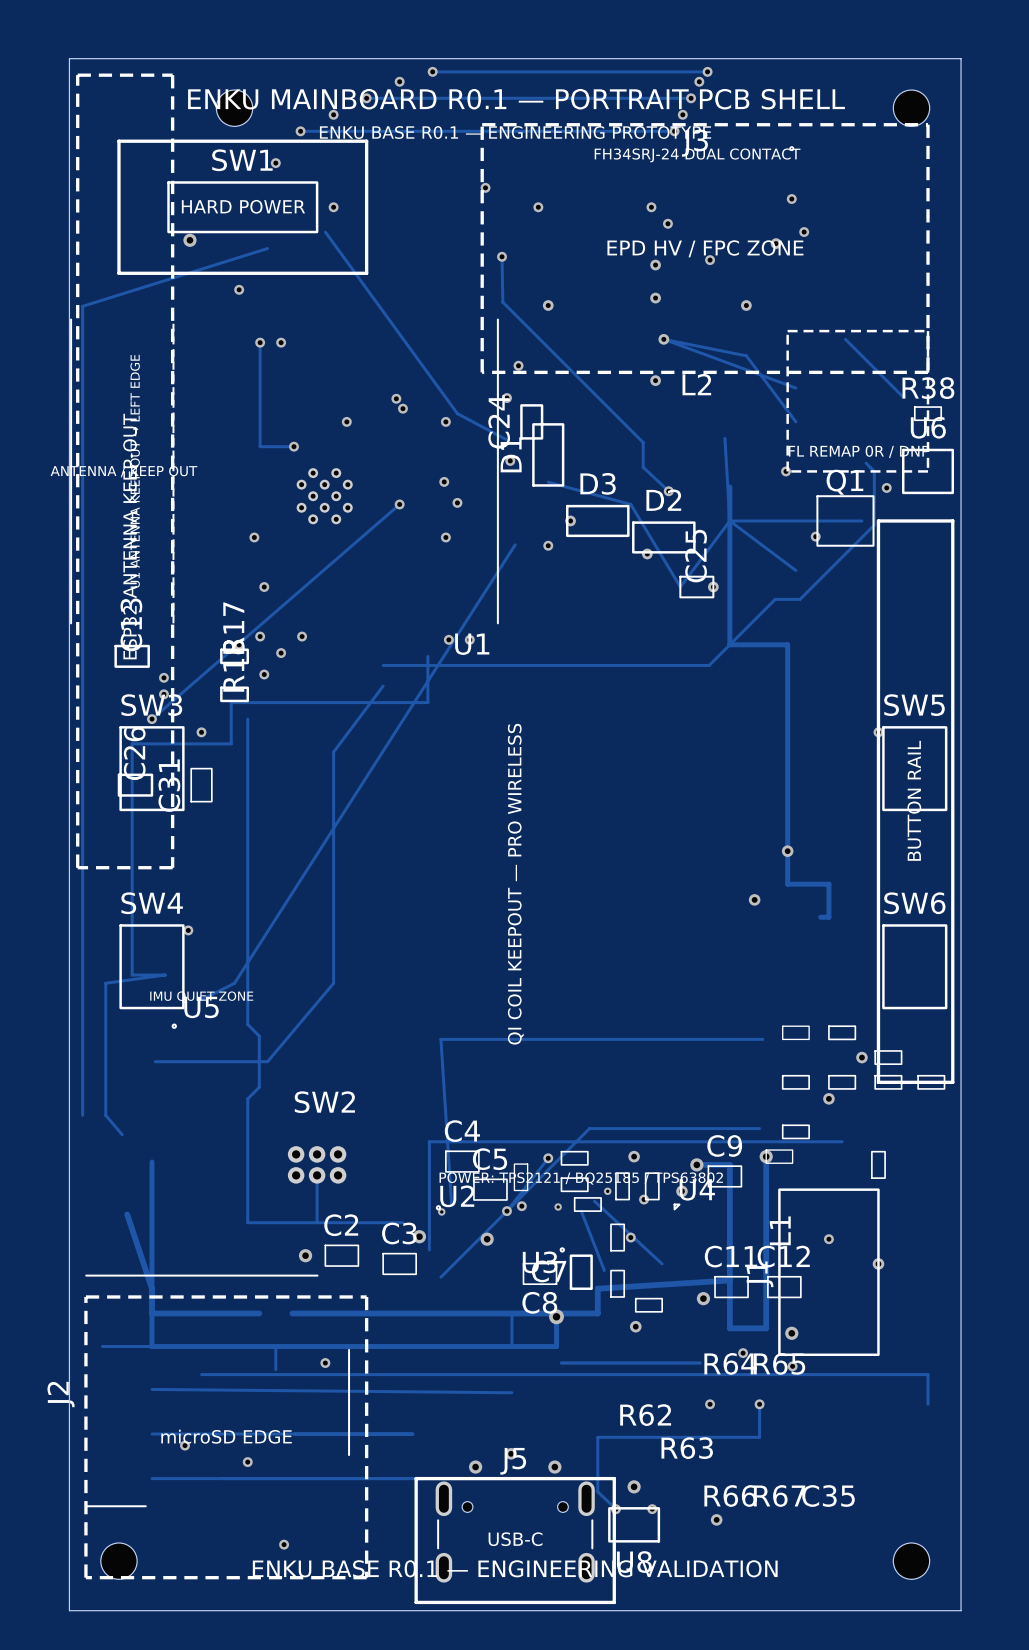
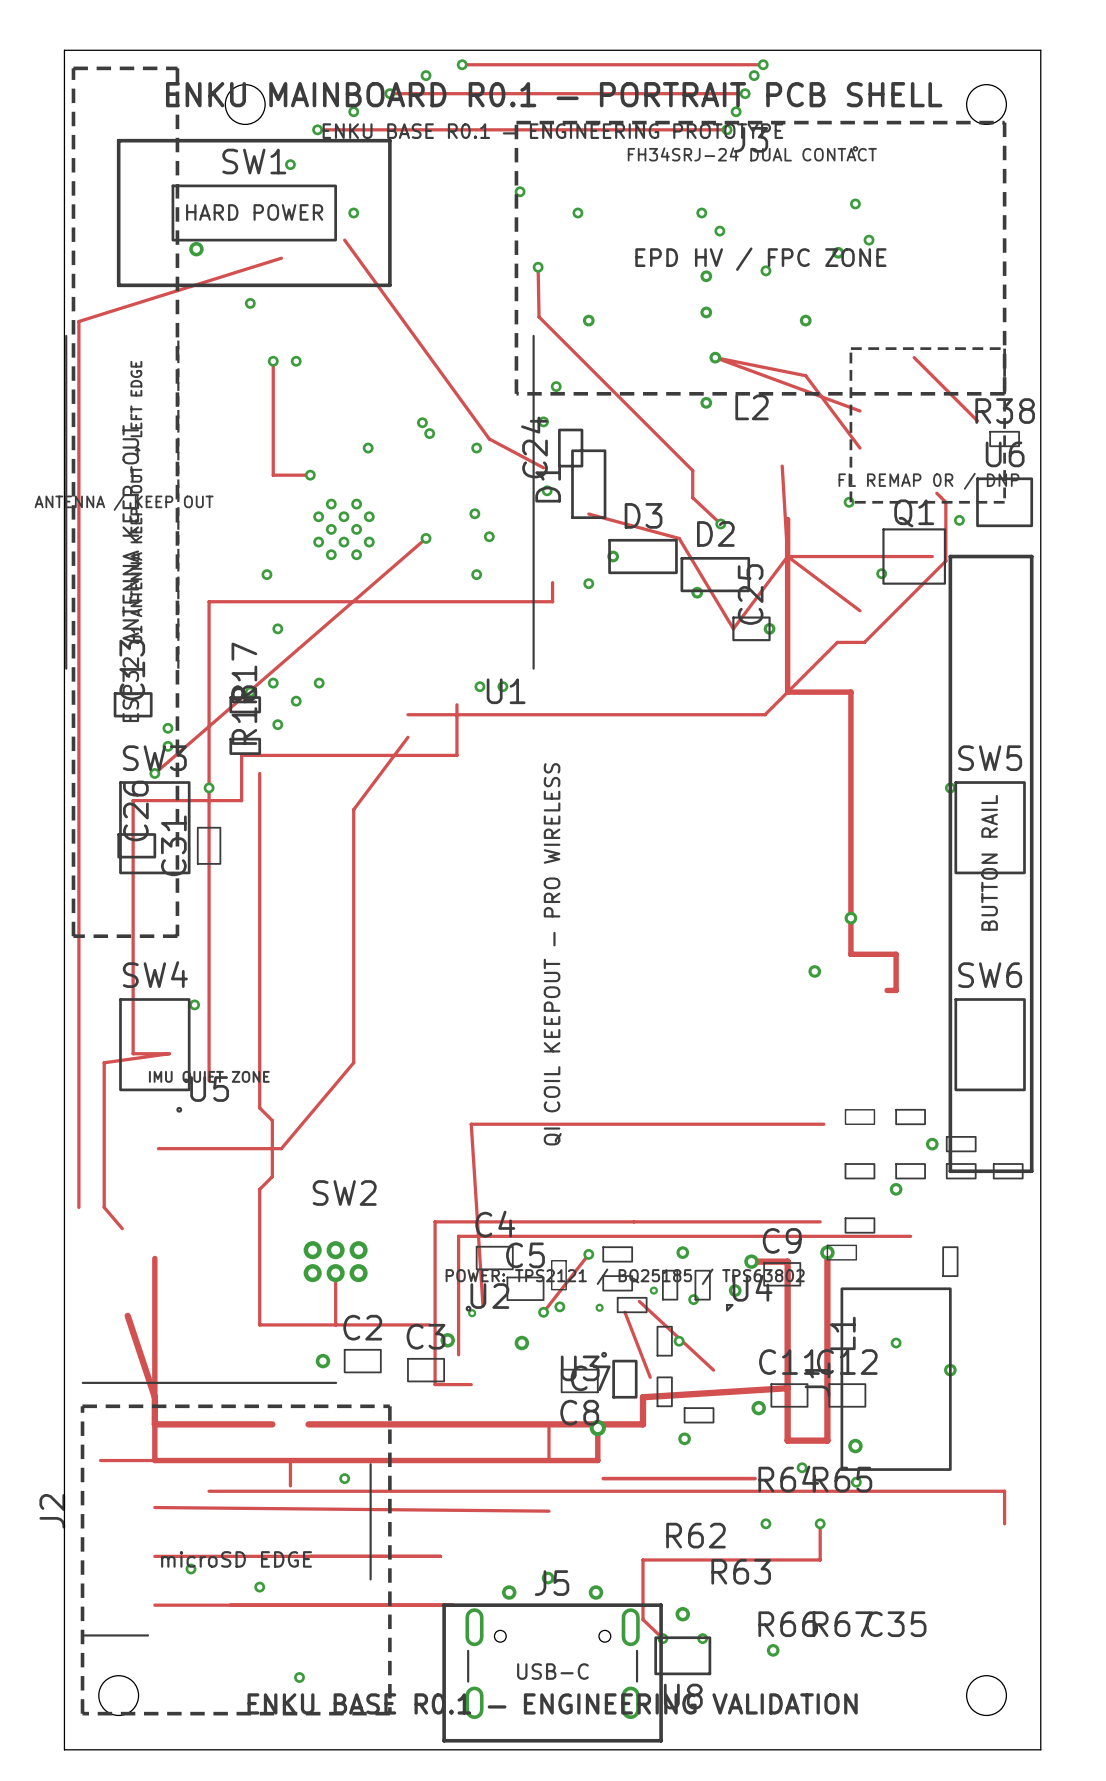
track: (515, 544) (234, 983) (201, 999) -> (552, 582) (552, 601) (209, 601) (209, 1080)
track: (589, 1128) (440, 1277) -> (633, 1221) (435, 1221) (435, 1384) (471, 1384)

